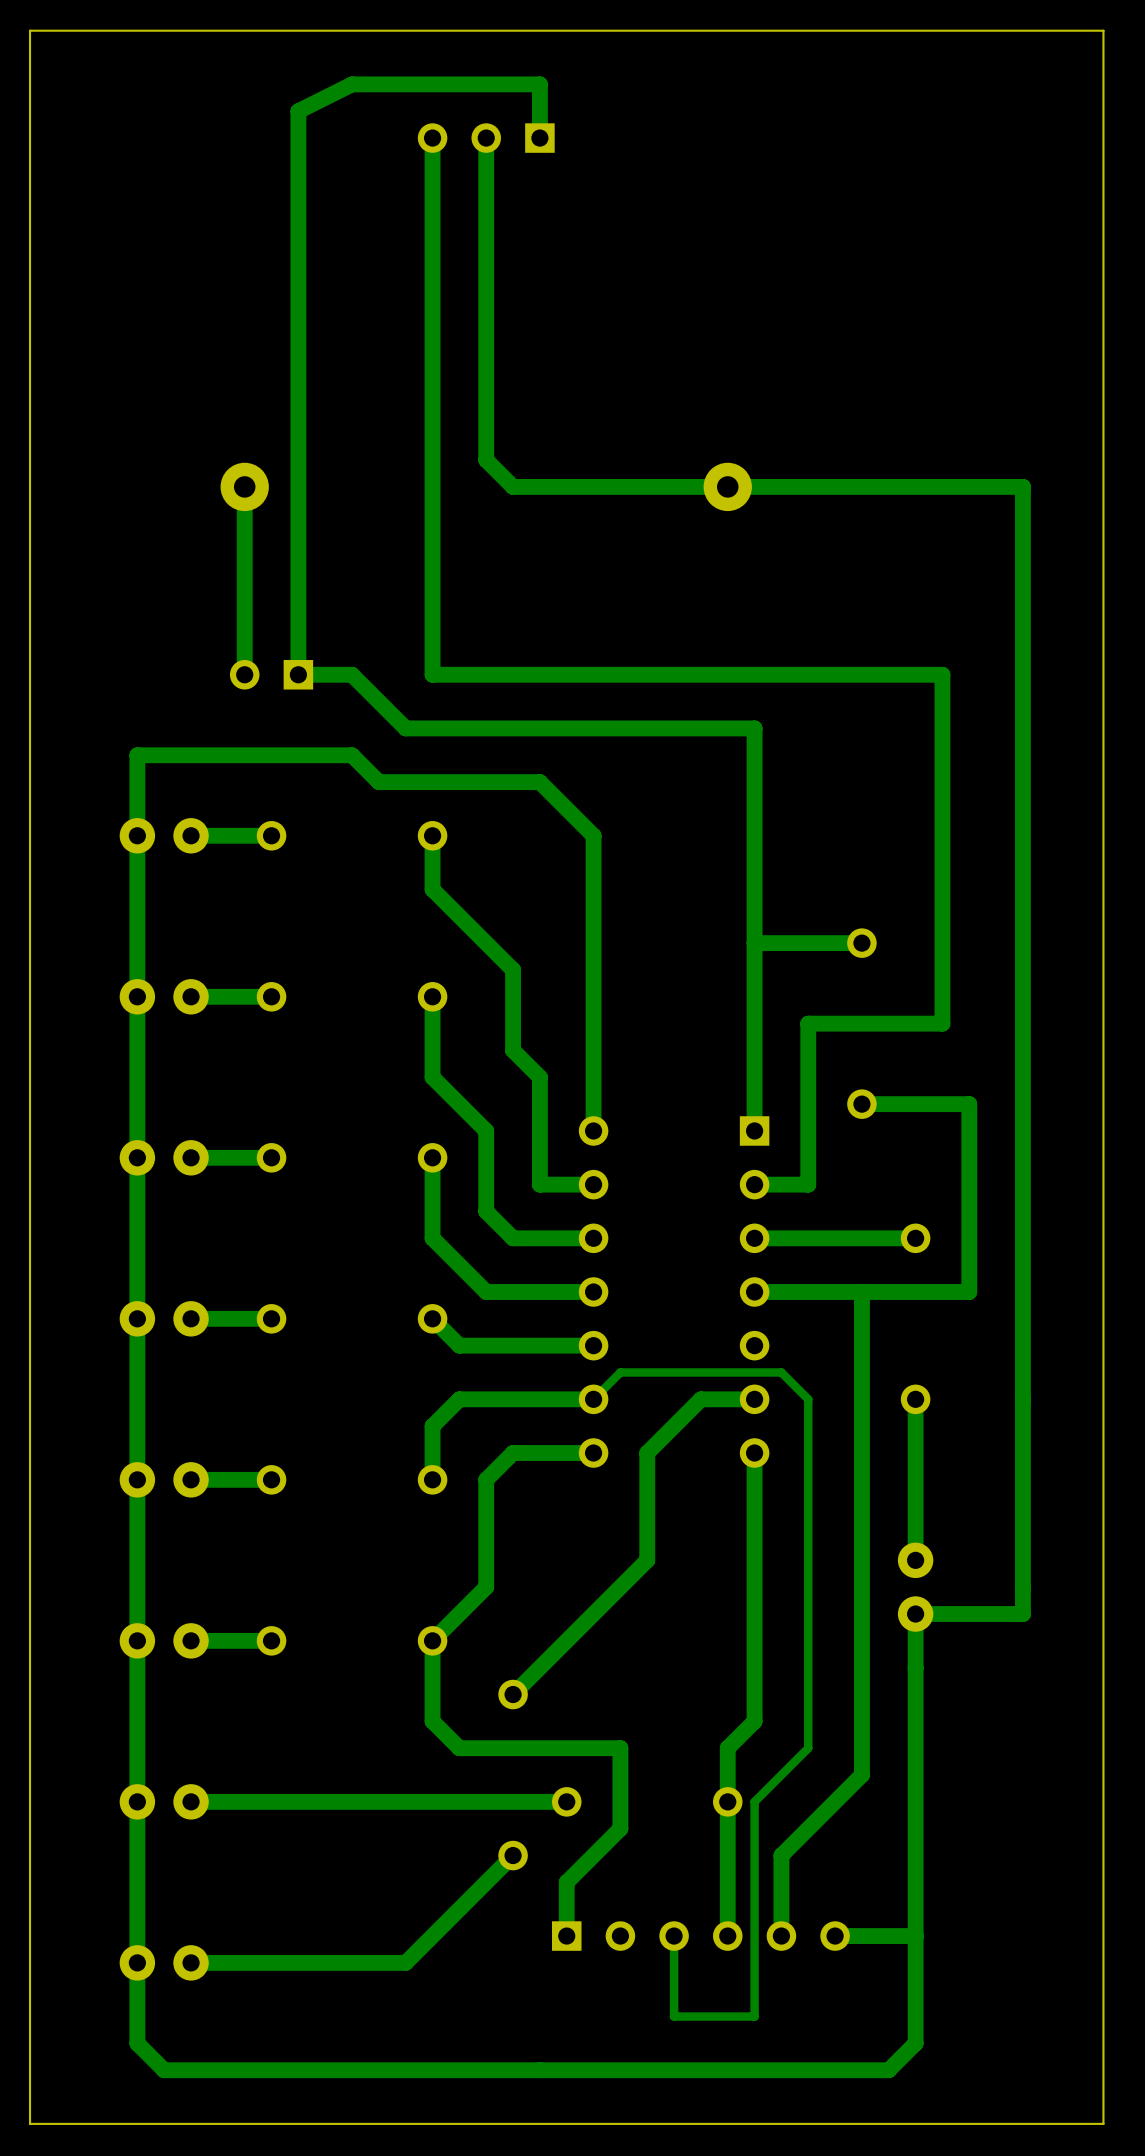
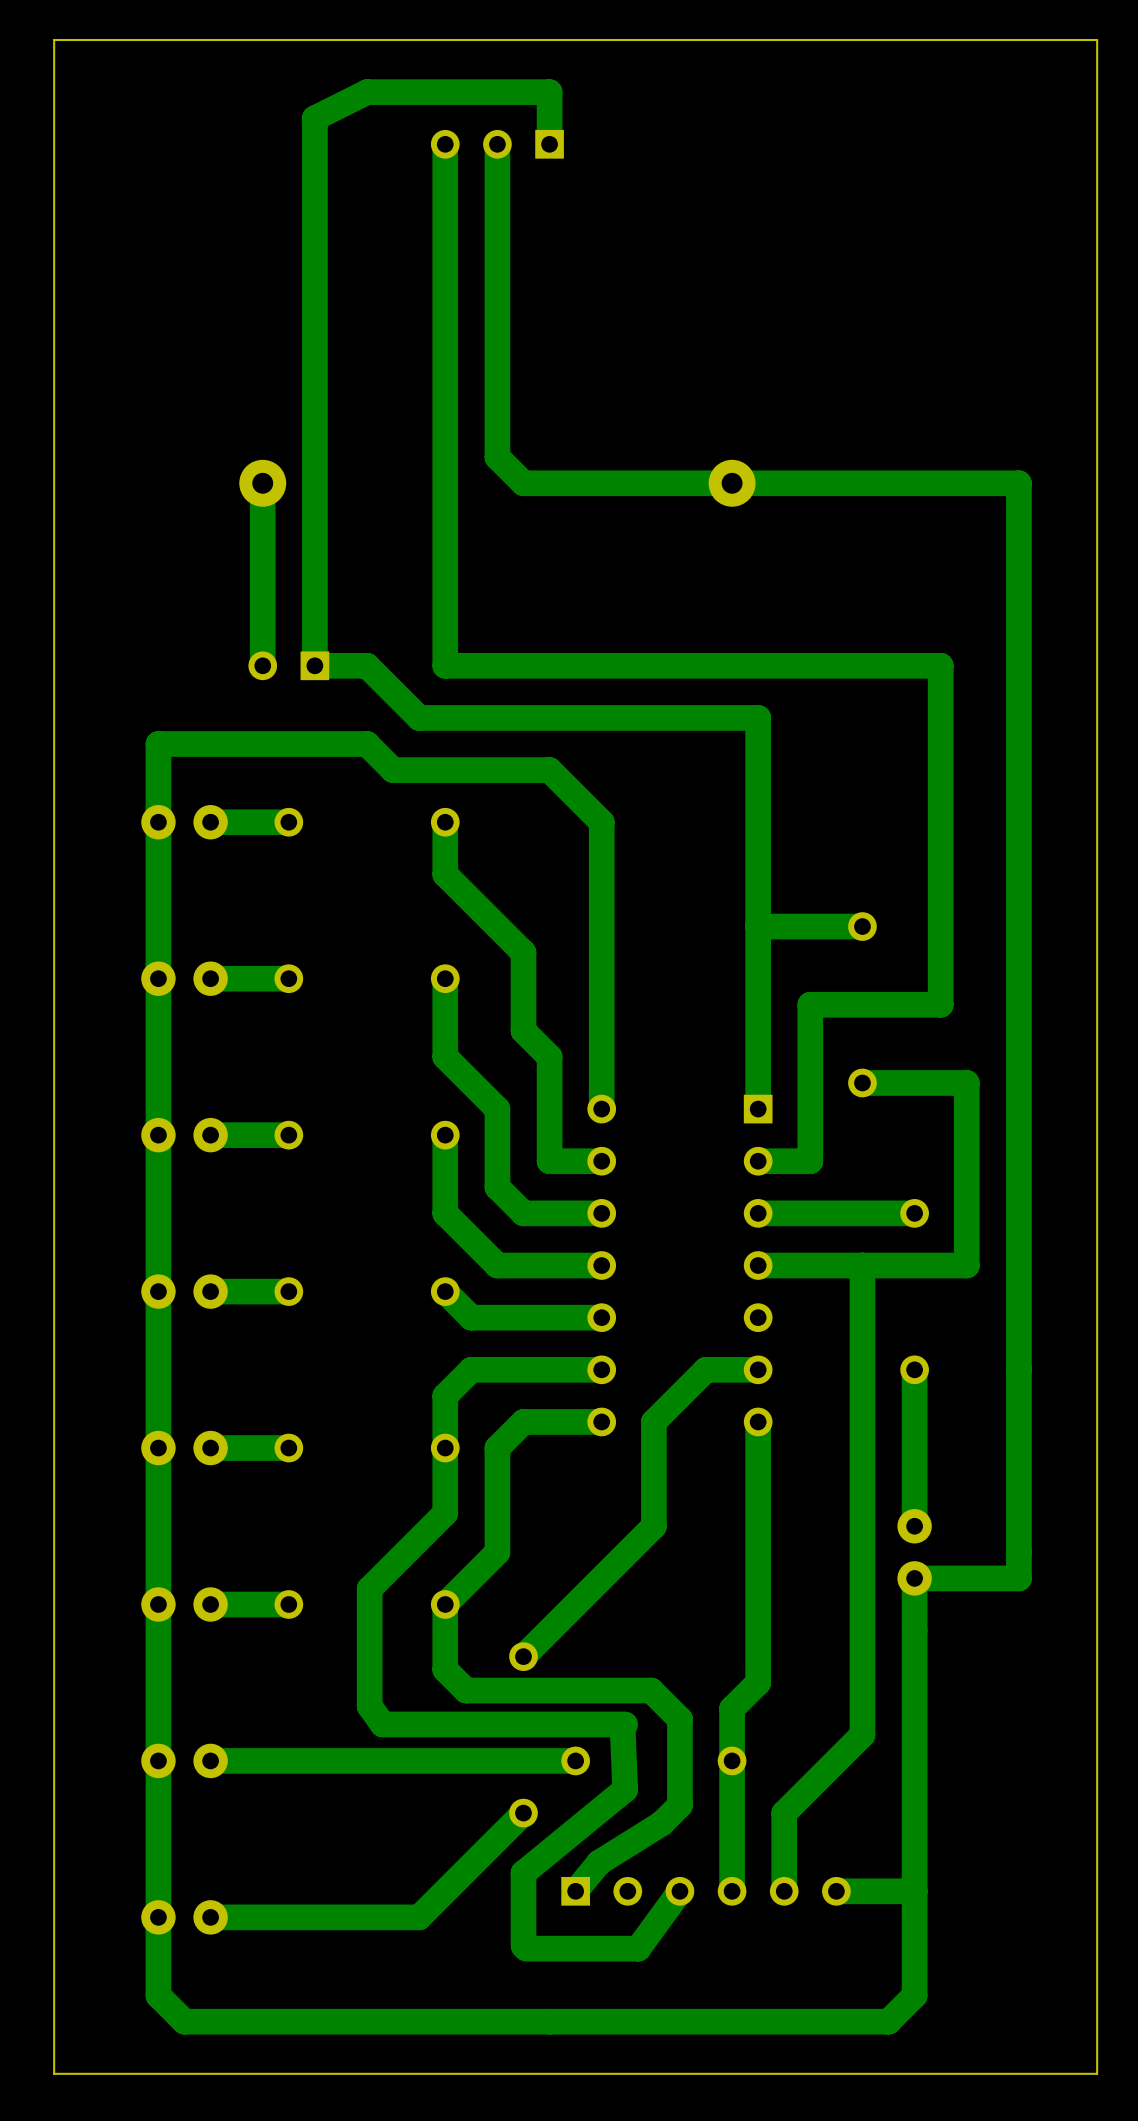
track width: thin (432, 138) (432, 674) (942, 674) (942, 1023) (808, 1023) (808, 1184) (754, 1184) -> thick (445, 144) (445, 665) (940, 665) (940, 1004) (810, 1004) (810, 1161) (758, 1161)
track width: thin (486, 138) (486, 460) (513, 486) (1022, 486) (1022, 1614) (915, 1614) (915, 2043) (888, 2070) (164, 2070) (137, 2043) (137, 755) (352, 755) (378, 782) (539, 782) (593, 835) (593, 1130) -> thick (497, 144) (497, 457) (523, 483) (1018, 483) (1018, 1578) (914, 1578) (914, 1995) (888, 2021) (184, 2021) (158, 1995) (158, 744) (367, 744) (393, 770) (549, 770) (601, 822) (601, 1109)
track width: thin (539, 138) (539, 84) (352, 84) (298, 111) (298, 674) (352, 674) (405, 728) (754, 728) (754, 1130) -> thick (549, 144) (549, 92) (367, 92) (314, 118) (314, 665) (367, 665) (419, 717) (758, 717) (758, 1109)
track width: thin (244, 486) (244, 674) -> thick (262, 483) (262, 665)
track width: thin (271, 835) (191, 835) -> thick (288, 822) (210, 822)
track width: thin (432, 835) (432, 889) (513, 969) (513, 1050) (539, 1077) (539, 1184) (593, 1184) -> thick (445, 822) (445, 874) (523, 952) (523, 1030) (549, 1056) (549, 1161) (601, 1161)
track width: thin (861, 943) (754, 943) -> thick (862, 926) (758, 926)
track width: thin (271, 996) (191, 996) -> thick (288, 978) (210, 978)
track width: thin (432, 996) (432, 1077) (486, 1130) (486, 1211) (513, 1238) (593, 1238) -> thick (445, 978) (445, 1056) (497, 1109) (497, 1187) (523, 1213) (601, 1213)
track width: thin (861, 1104) (969, 1104) (969, 1291) (754, 1291) -> thick (862, 1082) (966, 1082) (966, 1265) (758, 1265)
track width: thin (271, 1157) (191, 1157) -> thick (288, 1135) (210, 1135)
track width: thin (432, 1157) (432, 1238) (486, 1291) (593, 1291) -> thick (445, 1135) (445, 1213) (497, 1265) (601, 1265)
track width: thin (915, 1238) (754, 1238) -> thick (914, 1213) (758, 1213)
track width: thin (861, 1291) (861, 1775) (781, 1855) (781, 1936) -> thick (862, 1265) (862, 1734) (784, 1813) (784, 1891)
track width: thin (271, 1318) (191, 1318) -> thick (288, 1291) (210, 1291)
track width: thin (432, 1318) (459, 1345) (593, 1345) -> thick (445, 1291) (471, 1317) (601, 1317)
track: (593, 1399) (620, 1372) (781, 1372) (808, 1399) (808, 1748) (754, 1801) (754, 2016) (674, 2016) (674, 1936) -> (445, 1448) (445, 1513) (369, 1588) (369, 1706) (382, 1724) (625, 1724) (622, 1727) (625, 1789) (523, 1873) (523, 1946) (526, 1948) (638, 1948) (679, 1891)
track width: thin (593, 1399) (459, 1399) (432, 1426) (432, 1479) -> thick (601, 1369) (471, 1369) (445, 1395) (445, 1448)
track width: thin (754, 1399) (700, 1399) (647, 1453) (647, 1560) (513, 1694) -> thick (758, 1369) (706, 1369) (653, 1421) (653, 1526) (523, 1656)
track width: thin (915, 1399) (915, 1560) -> thick (914, 1369) (914, 1526)
track width: thin (593, 1453) (513, 1453) (486, 1479) (486, 1587) (432, 1640) (432, 1707) -> thick (601, 1421) (523, 1421) (497, 1448) (497, 1552) (445, 1604) (445, 1669)
track width: thin (754, 1453) (754, 1721) (727, 1748) (727, 1936) -> thick (758, 1421) (758, 1682) (732, 1708) (732, 1891)
track width: thin (271, 1479) (191, 1479) -> thick (288, 1448) (210, 1448)
track width: thin (271, 1640) (191, 1640) -> thick (288, 1604) (210, 1604)
track: (432, 1707) (432, 1721) (459, 1748) (620, 1748) (620, 1828) (566, 1882) (566, 1936) -> (445, 1669) (466, 1690) (651, 1690) (679, 1719) (679, 1805) (661, 1823) (599, 1862) (575, 1891)
track width: thin (566, 1801) (191, 1801) -> thick (575, 1760) (210, 1760)
track width: thin (513, 1855) (405, 1962) (191, 1962) -> thick (523, 1813) (419, 1917) (210, 1917)
track width: thin (915, 1936) (835, 1936) -> thick (914, 1891) (836, 1891)

